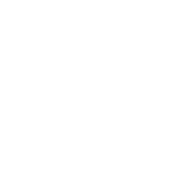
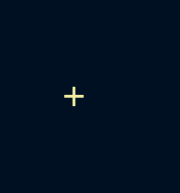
text: none -> + (73, 96)

